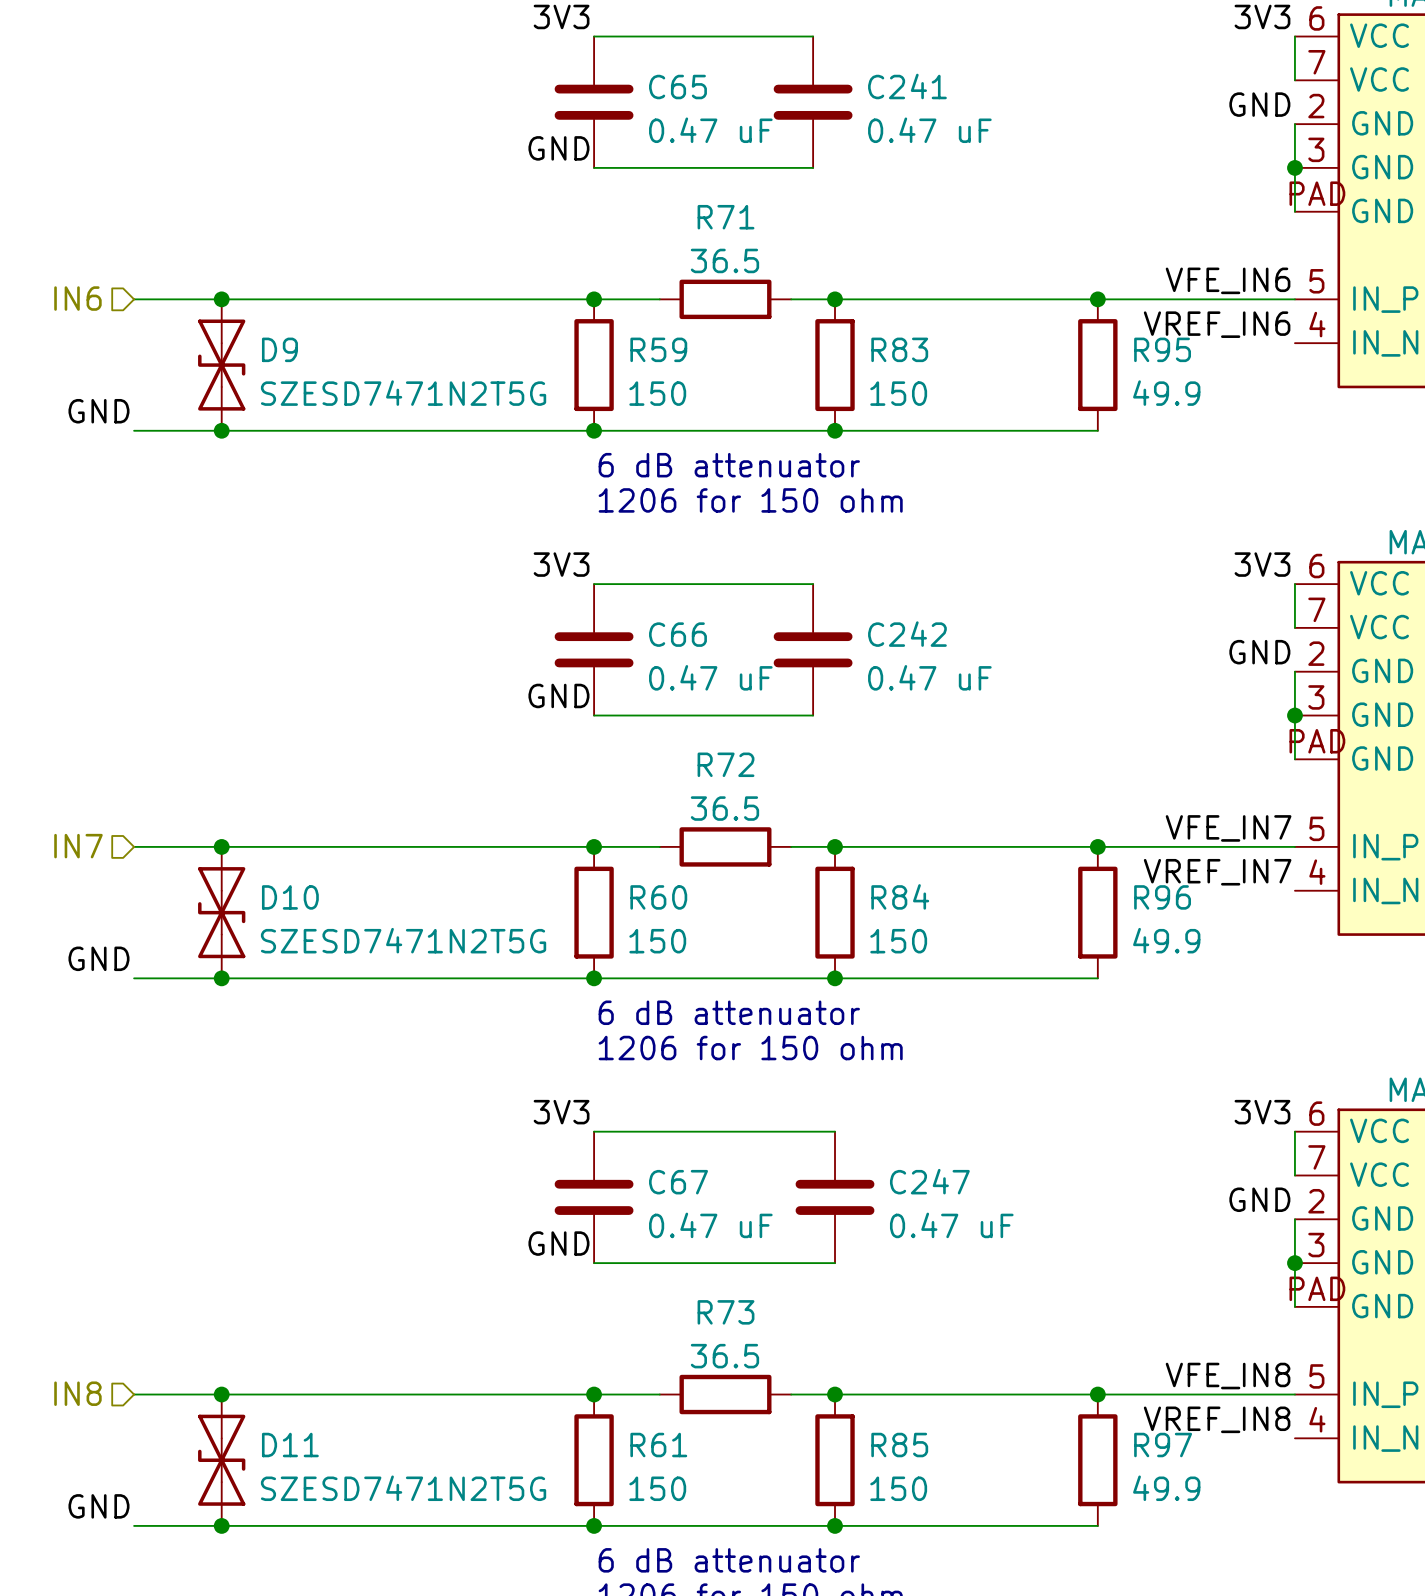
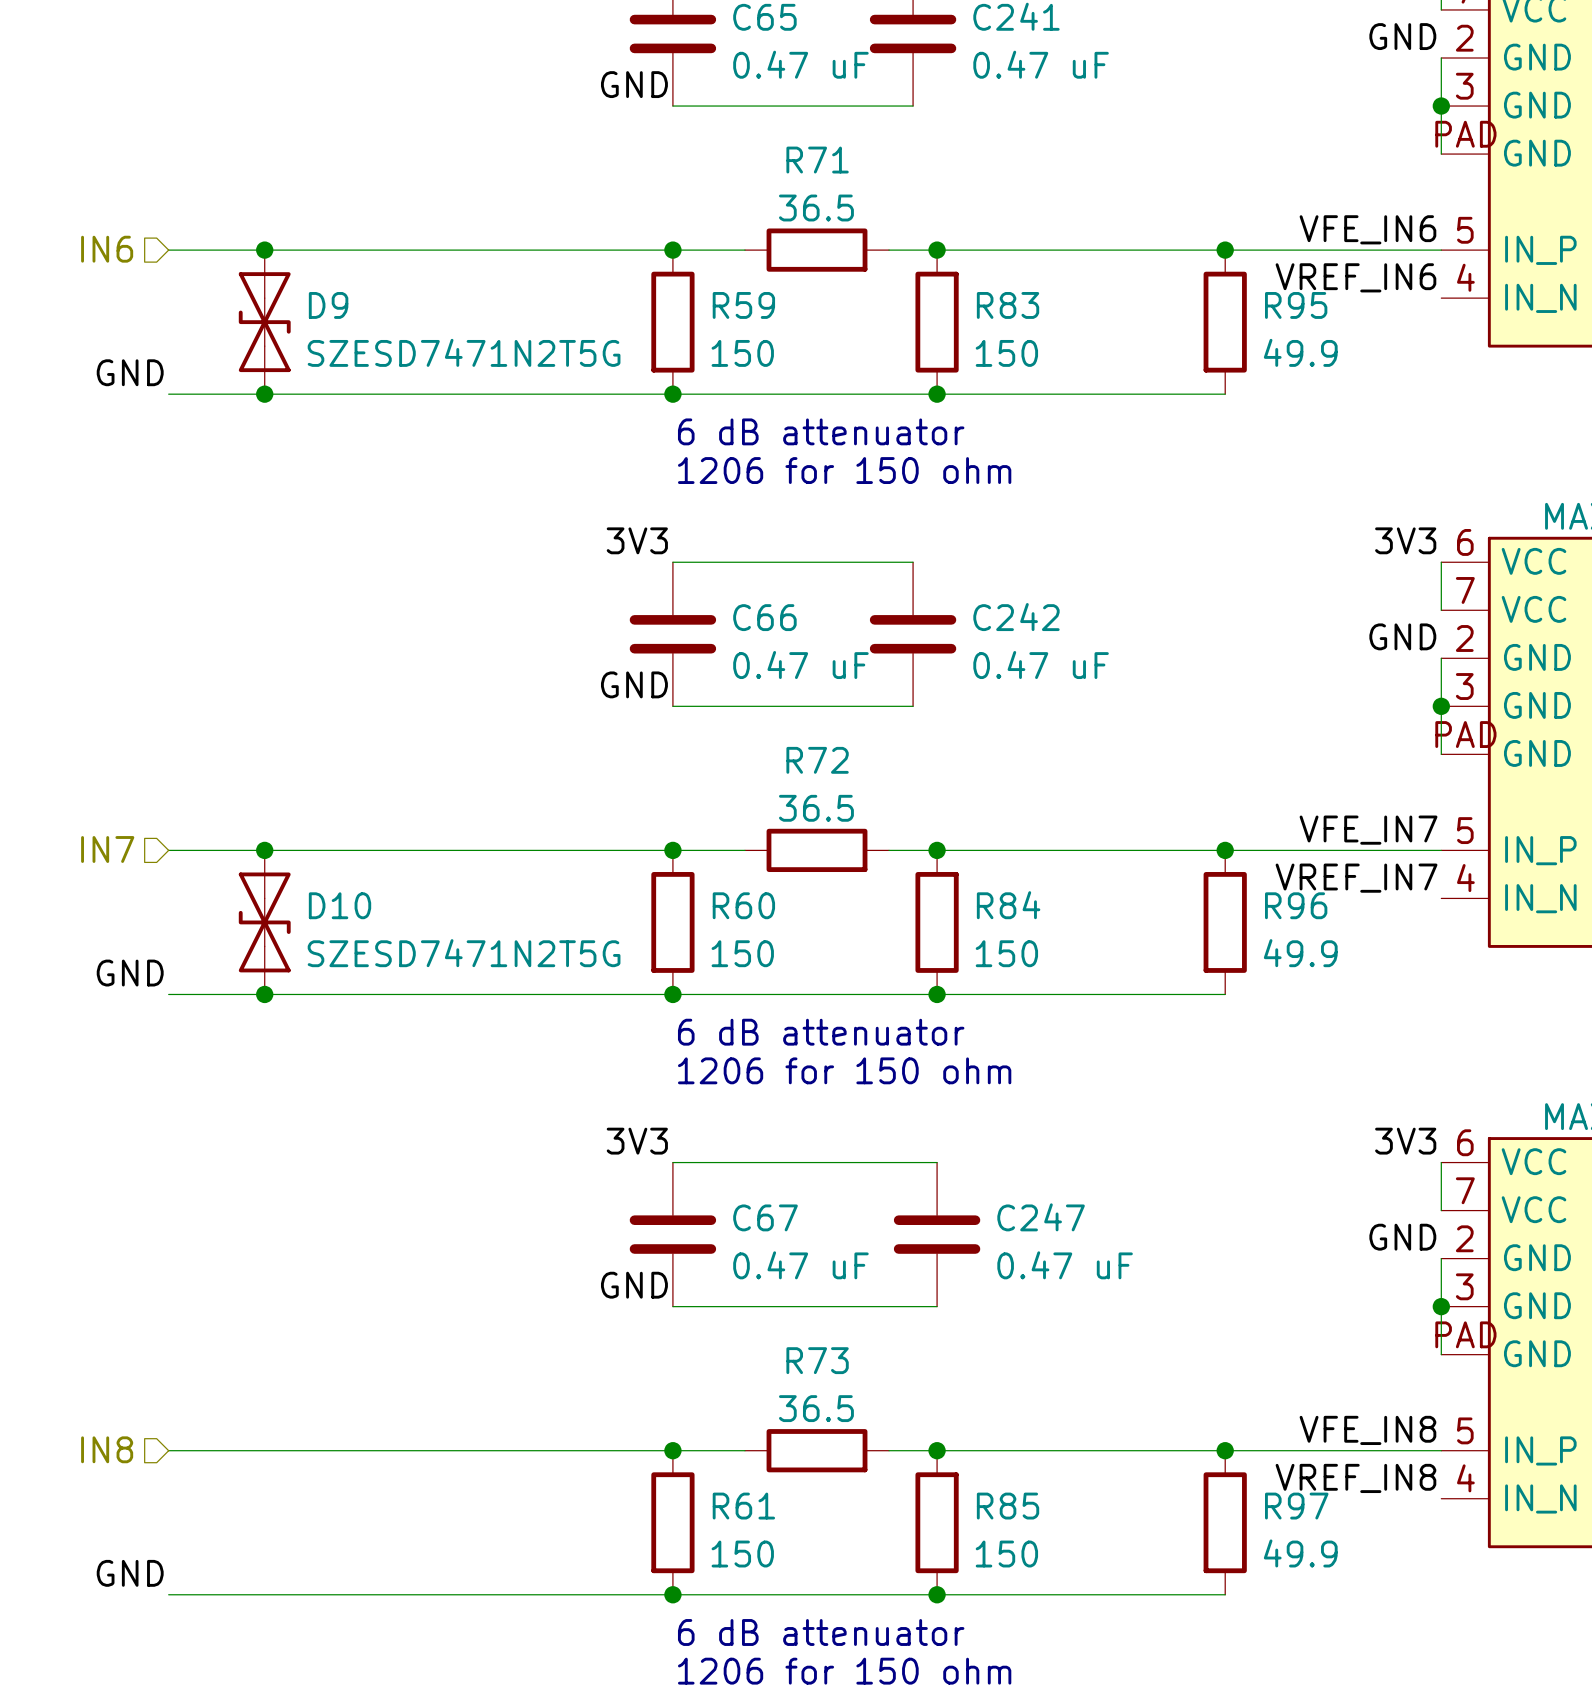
junction: (221, 1394) -> none
D11: SZESD7471N2T5G (221, 1460) -> none
junction: (221, 1525) -> none

